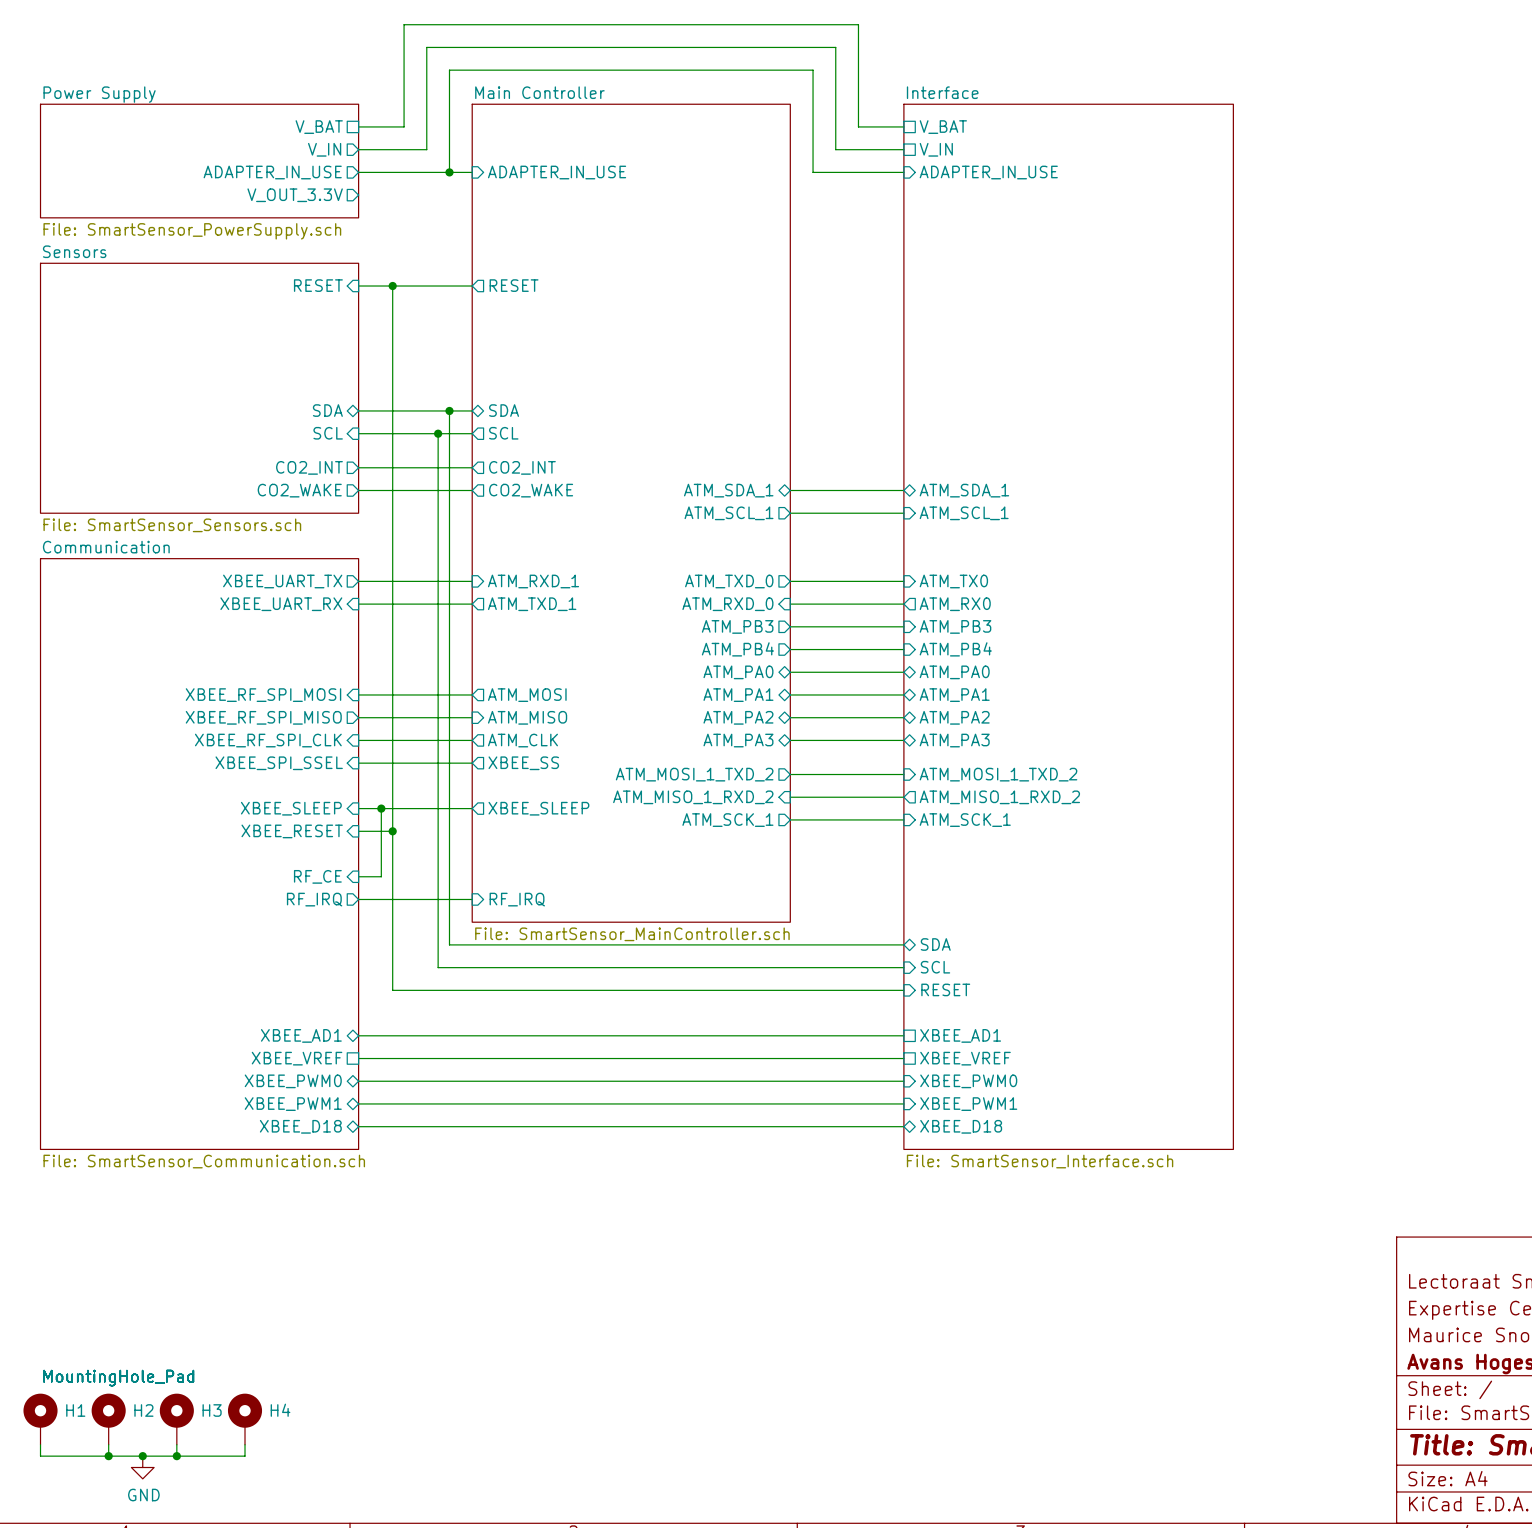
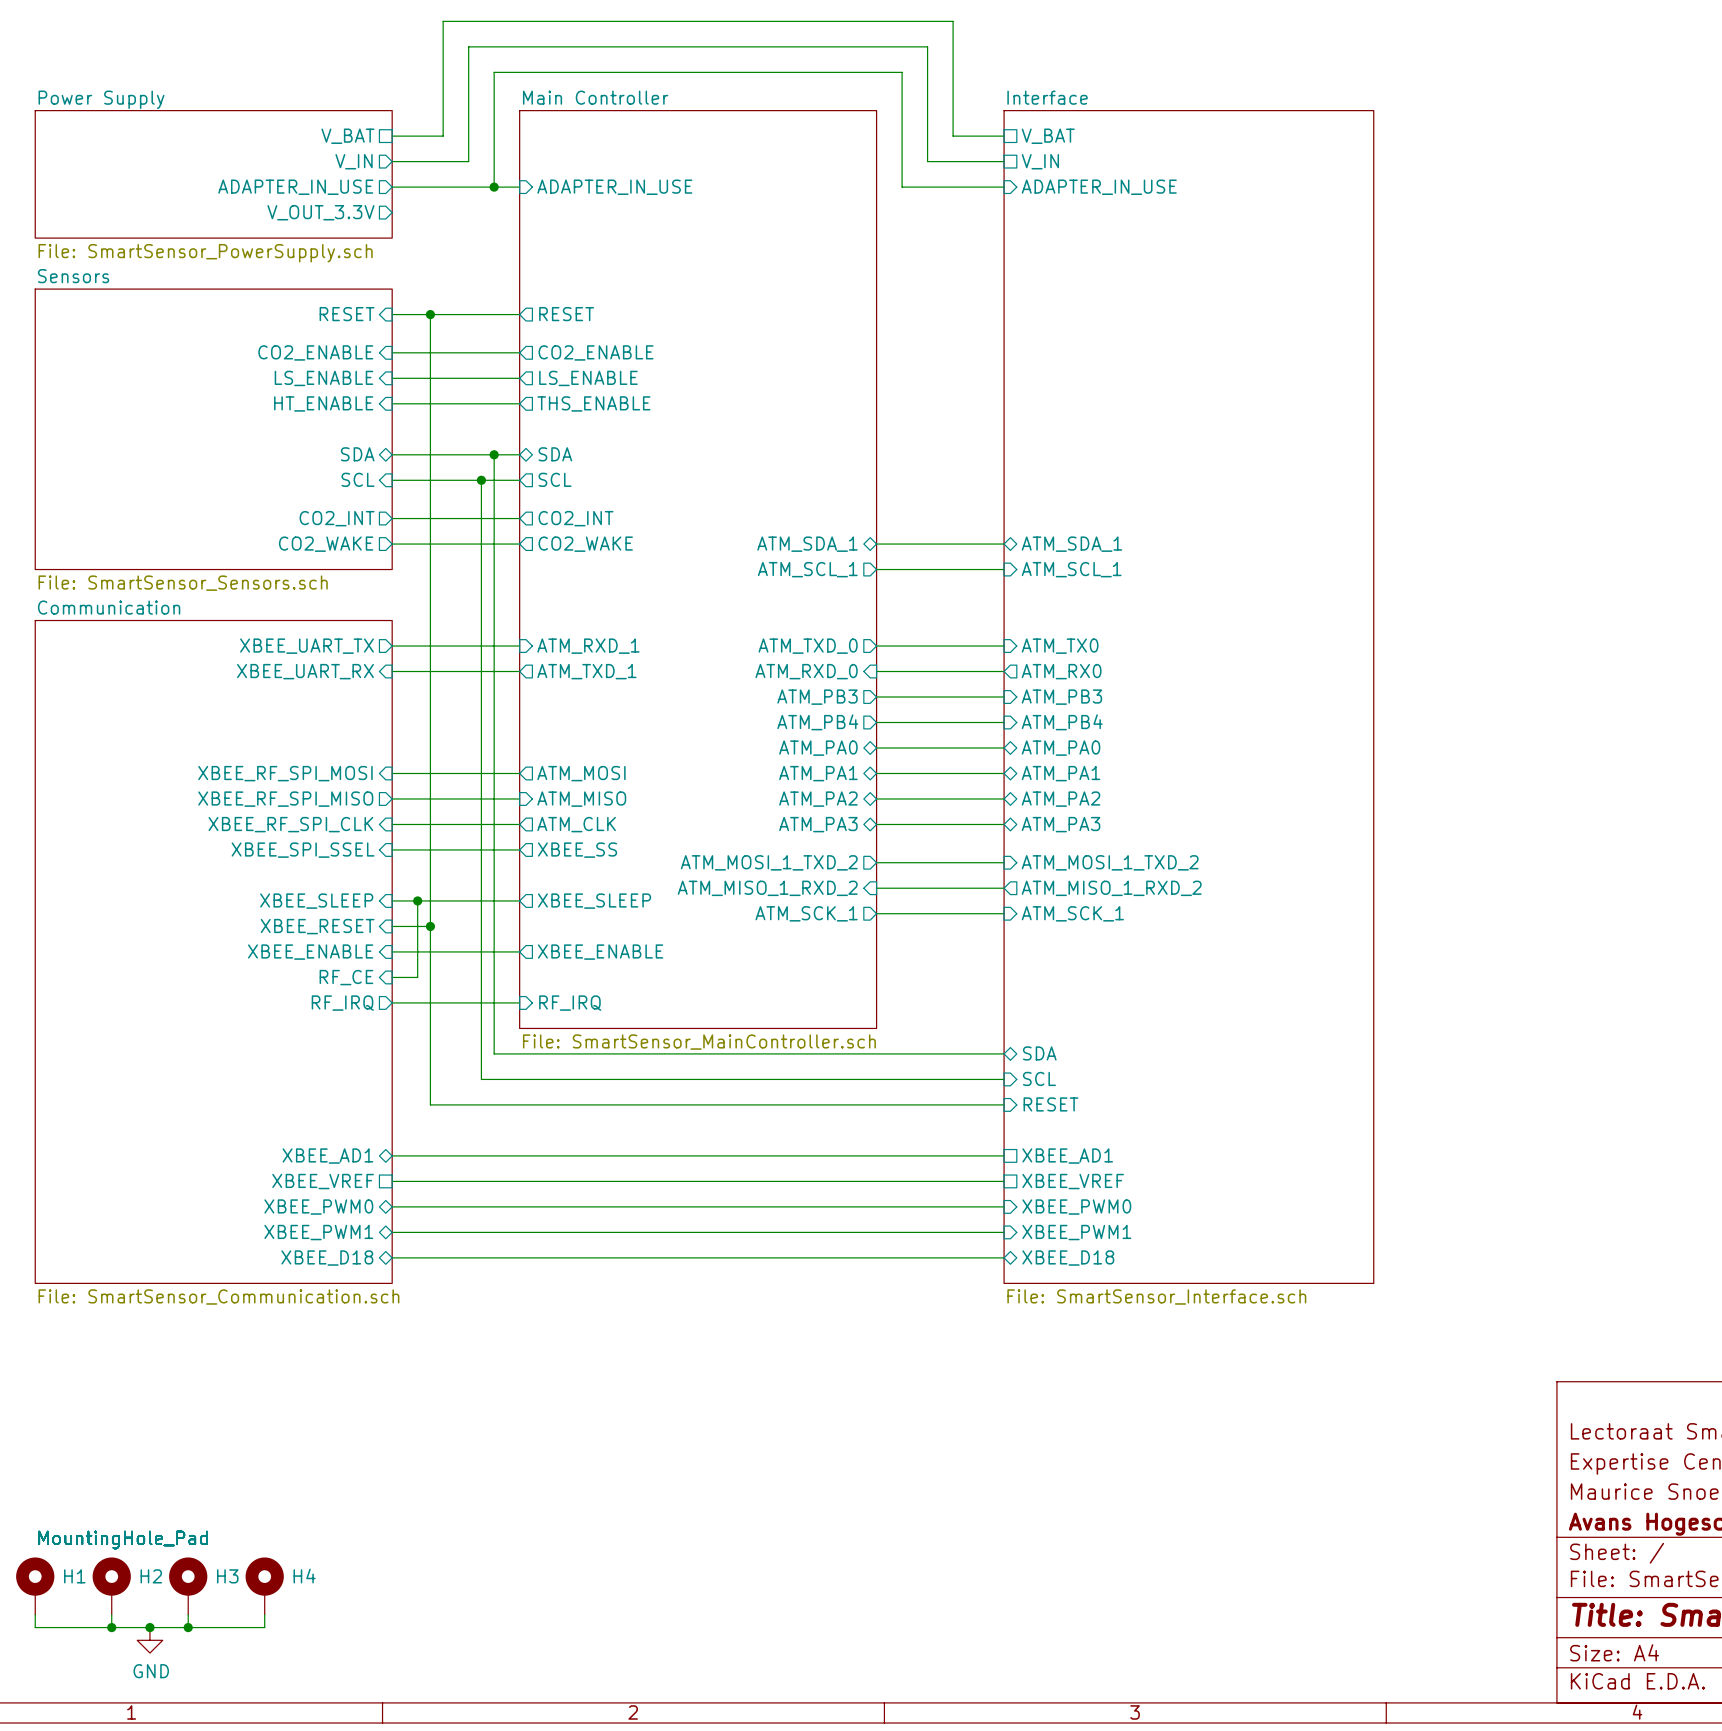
sheet pin: none -> CO2_ENABLE (315, 352)
wire: none -> (392, 352) (519, 352)
sheet pin: none -> CO2_ENABLE (596, 352)
sheet pin: none -> LS_ENABLE (323, 378)
wire: none -> (392, 378) (519, 378)
sheet pin: none -> LS_ENABLE (588, 378)
sheet pin: none -> HT_ENABLE (323, 403)
wire: none -> (392, 403) (519, 403)
sheet pin: none -> THS_ENABLE (593, 403)
sheet pin: none -> XBEE_ENABLE (310, 952)
wire: none -> (392, 951) (519, 951)
sheet pin: none -> XBEE_ENABLE (600, 952)

